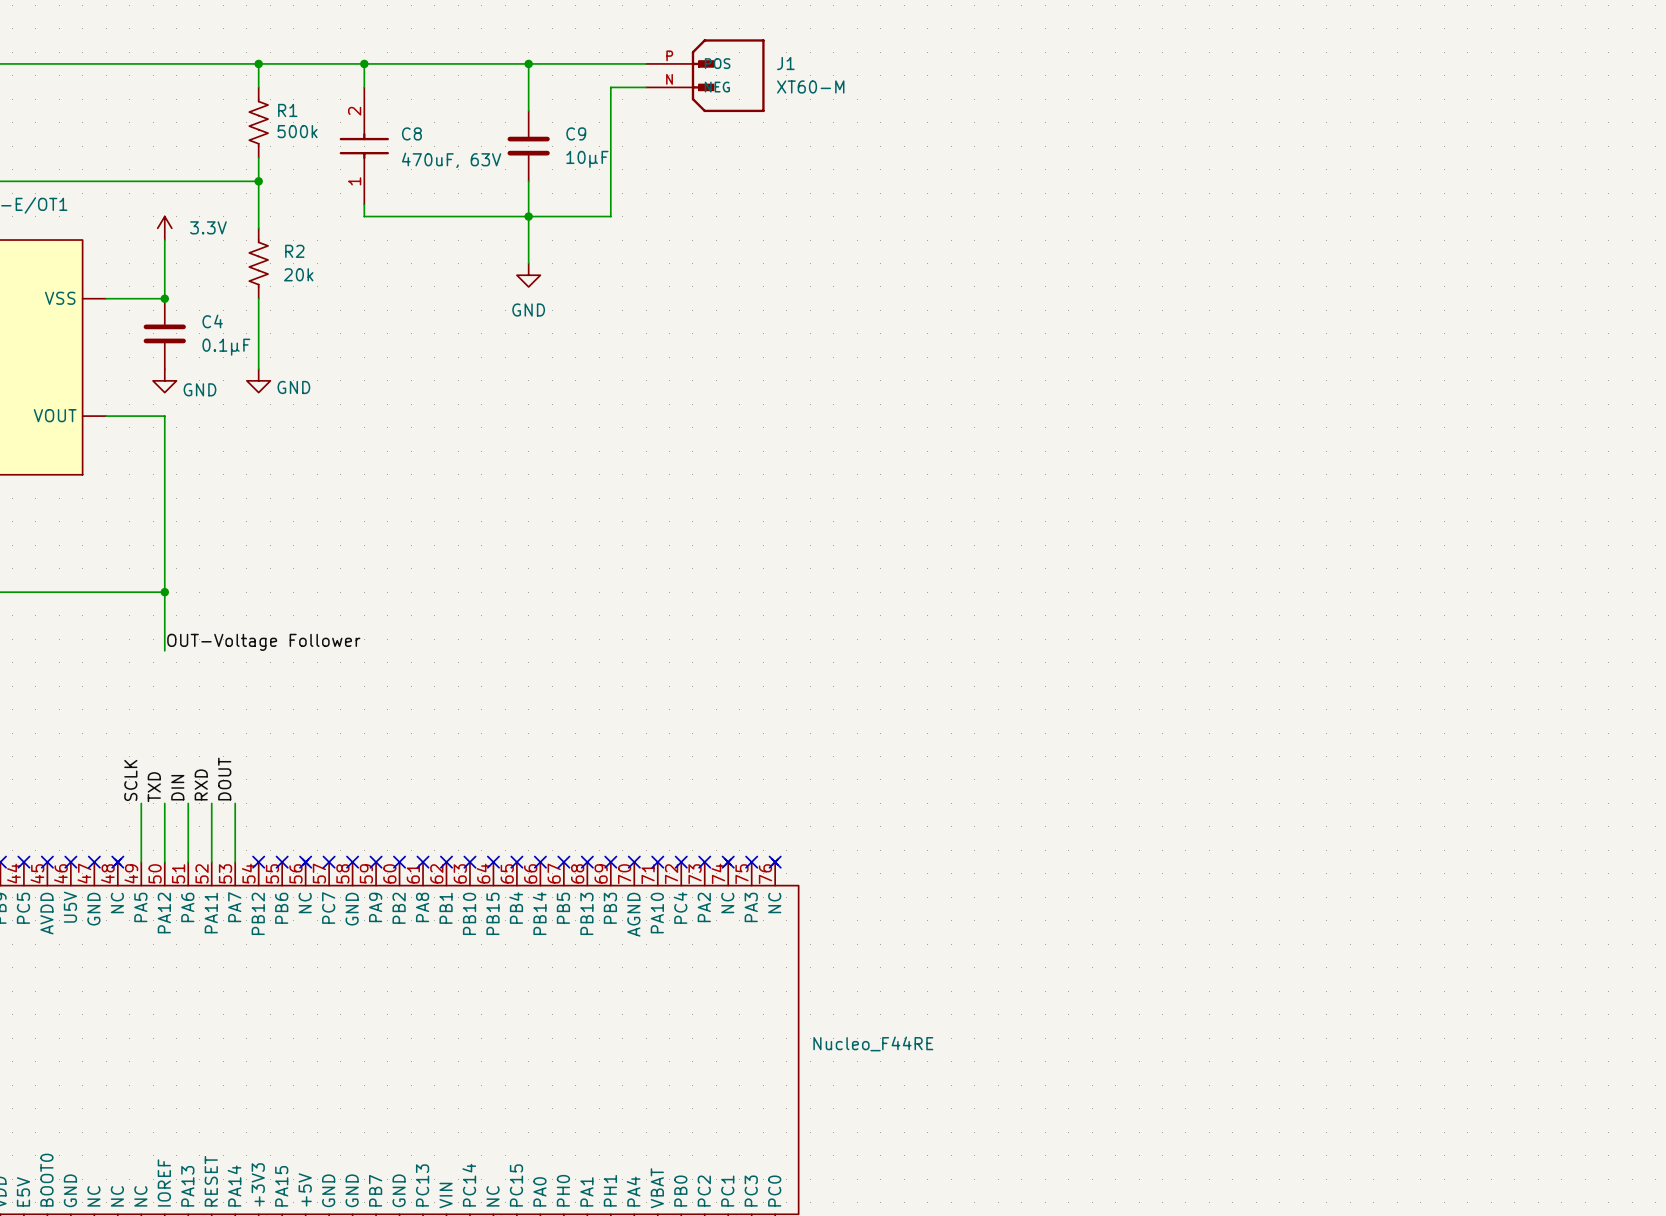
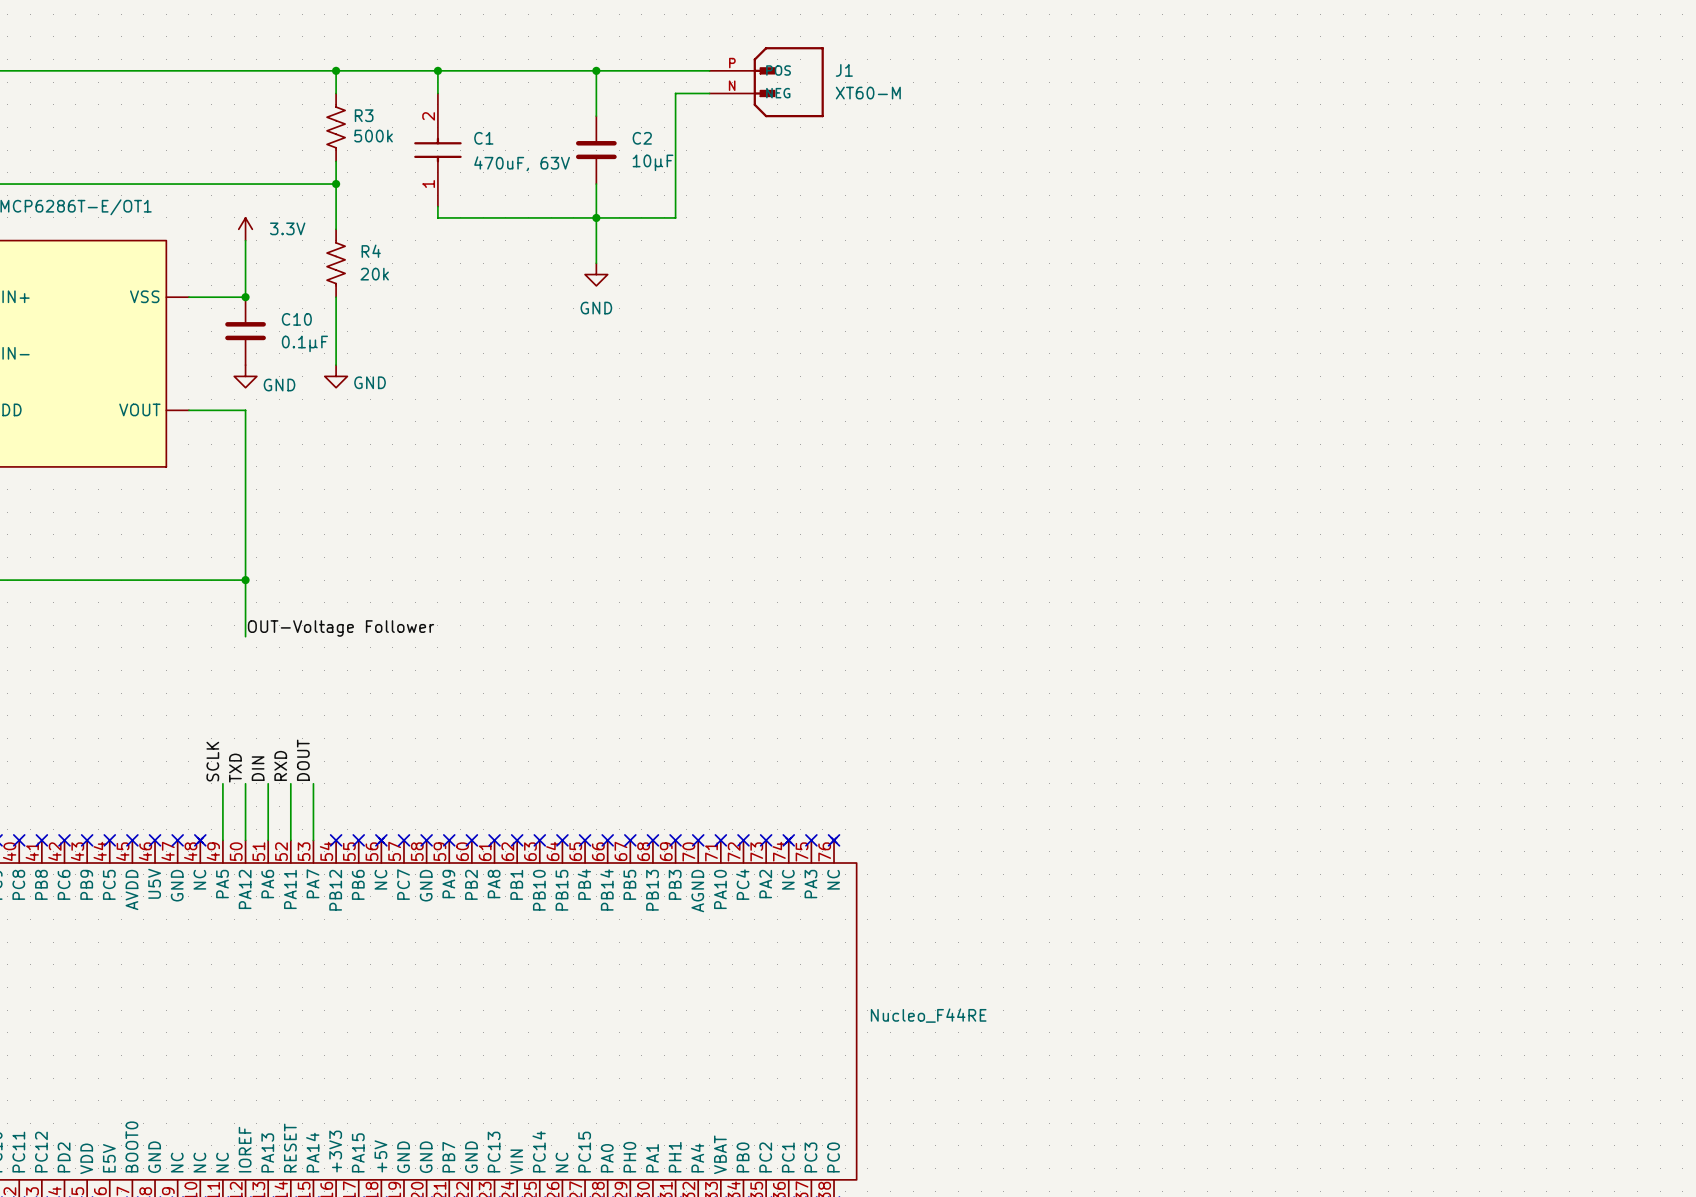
R1 name: R1 (287, 110) -> R3 (364, 115)
C8 name: C8 (411, 133) -> C1 (483, 138)
C9 name: C9 (576, 133) -> C2 (642, 138)
R2 name: R2 (294, 251) -> R4 (371, 251)
C4 name: C4 (212, 321) -> C10 (296, 319)

